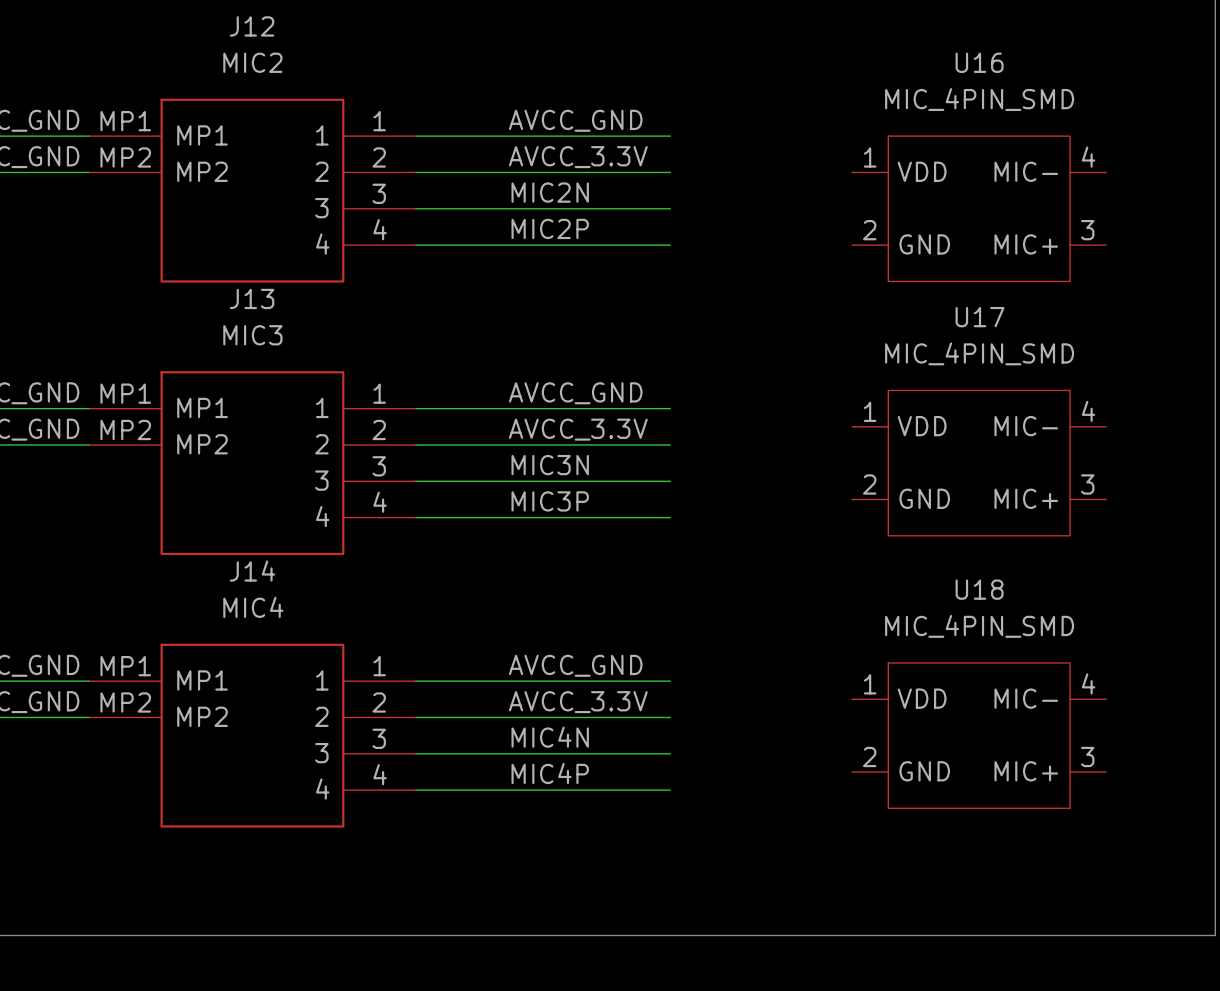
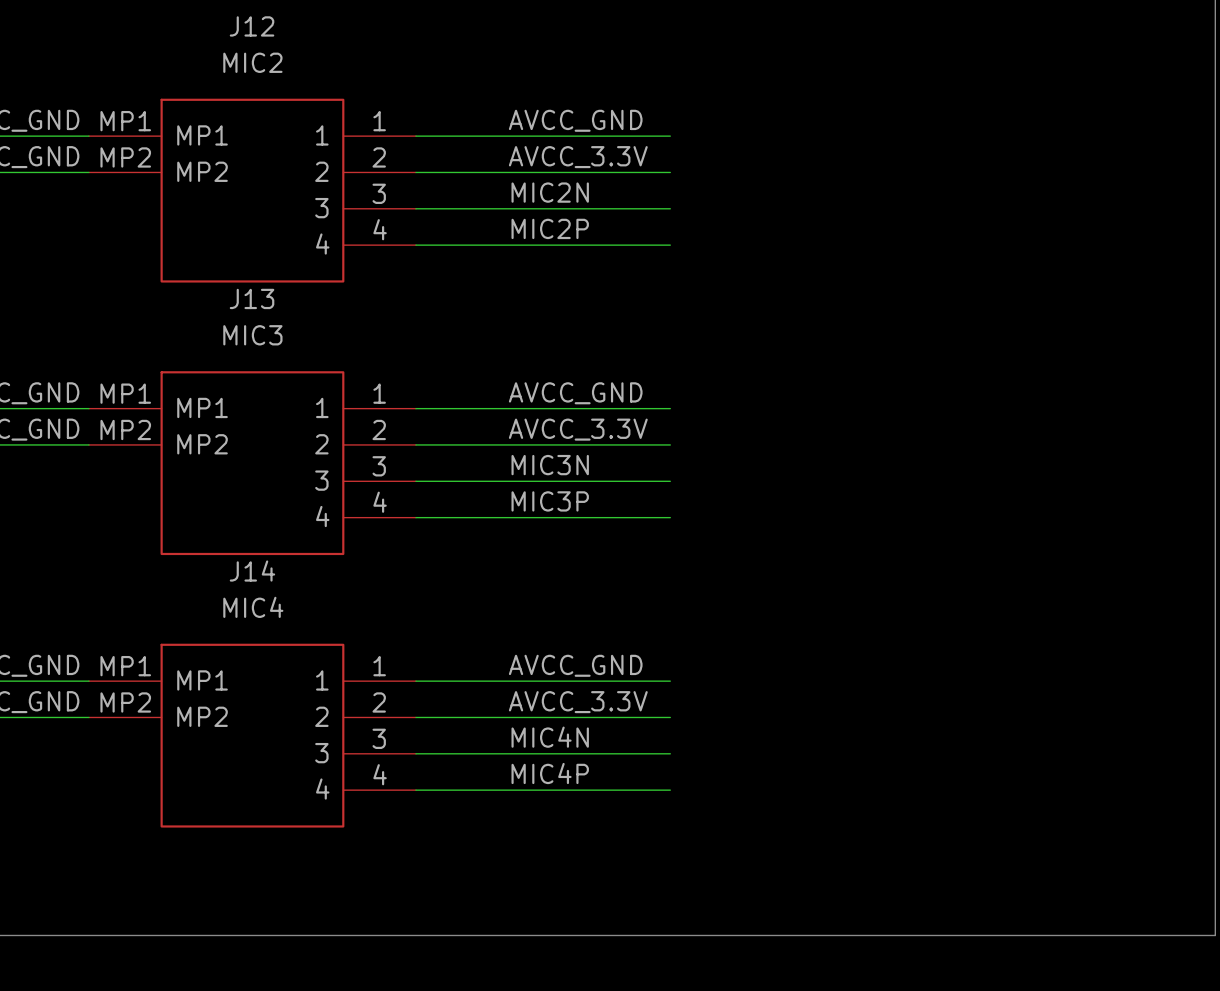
U16: MIC_4PIN_SMD (979, 208) -> none
U17: MIC_4PIN_SMD (979, 463) -> none
U18: MIC_4PIN_SMD (979, 735) -> none

